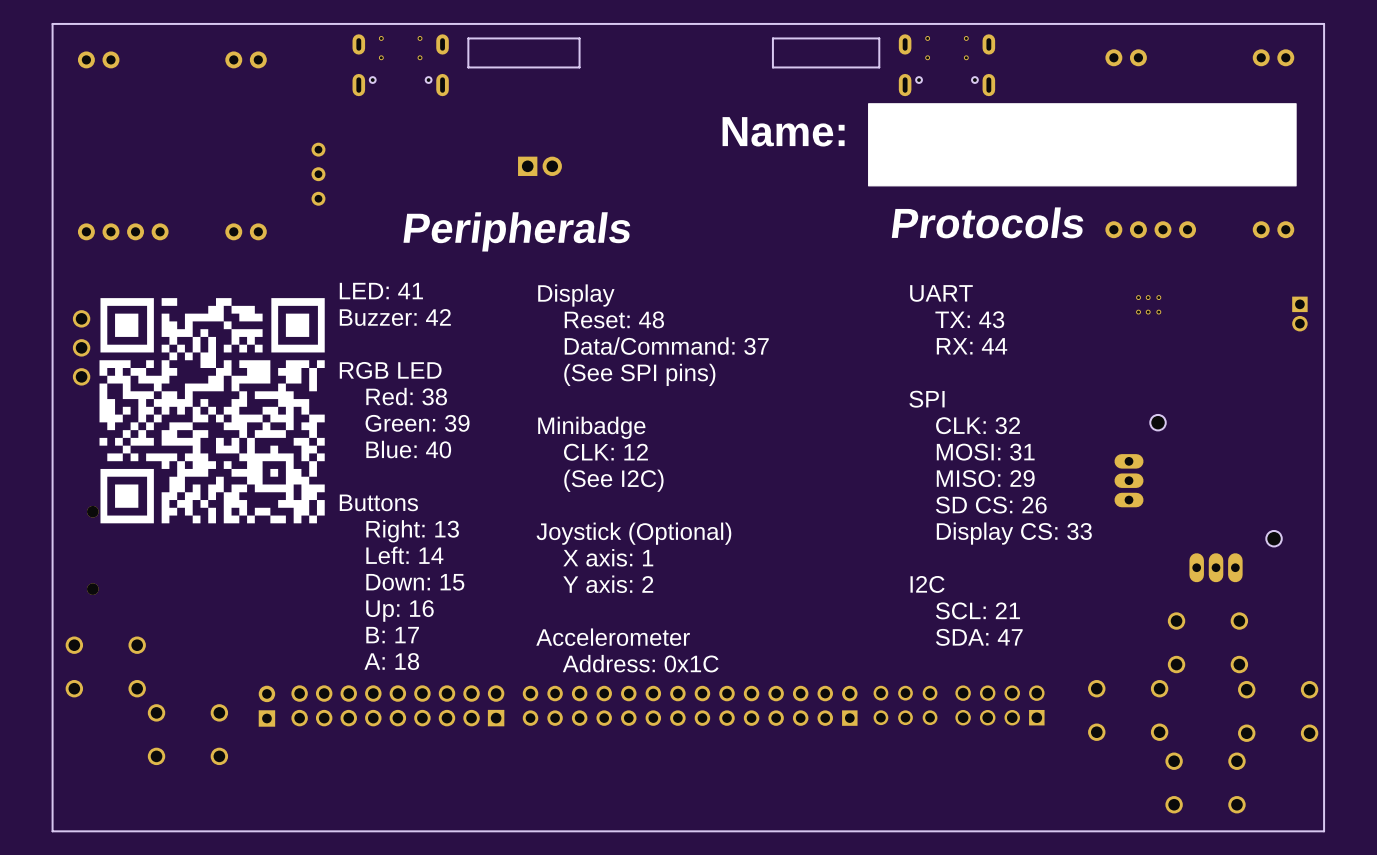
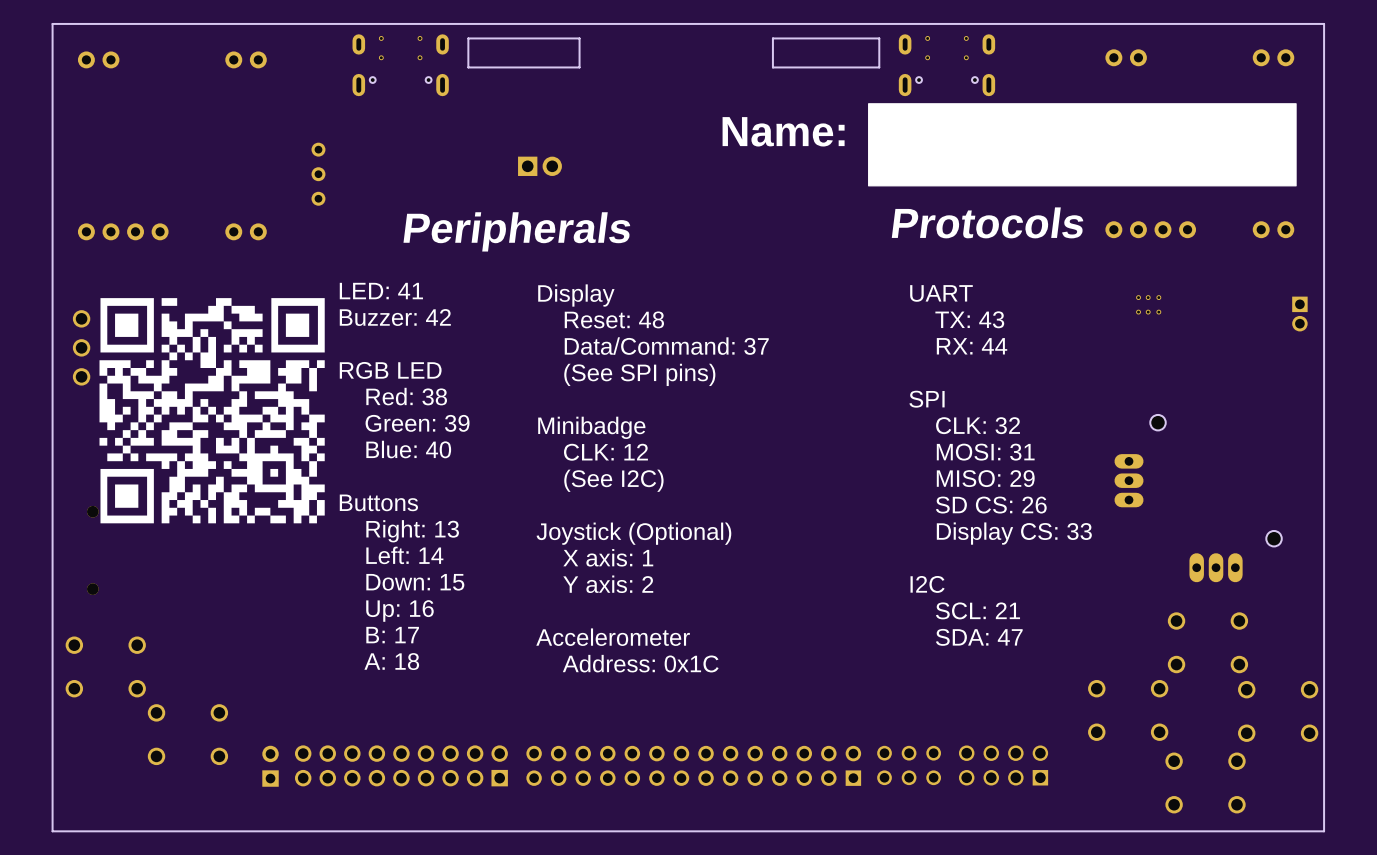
part position: (397, 705) -> (401, 765)
part position: (690, 705) -> (693, 765)
part position: (905, 705) -> (909, 765)
part position: (999, 705) -> (1003, 765)
part position: (266, 706) -> (270, 766)

